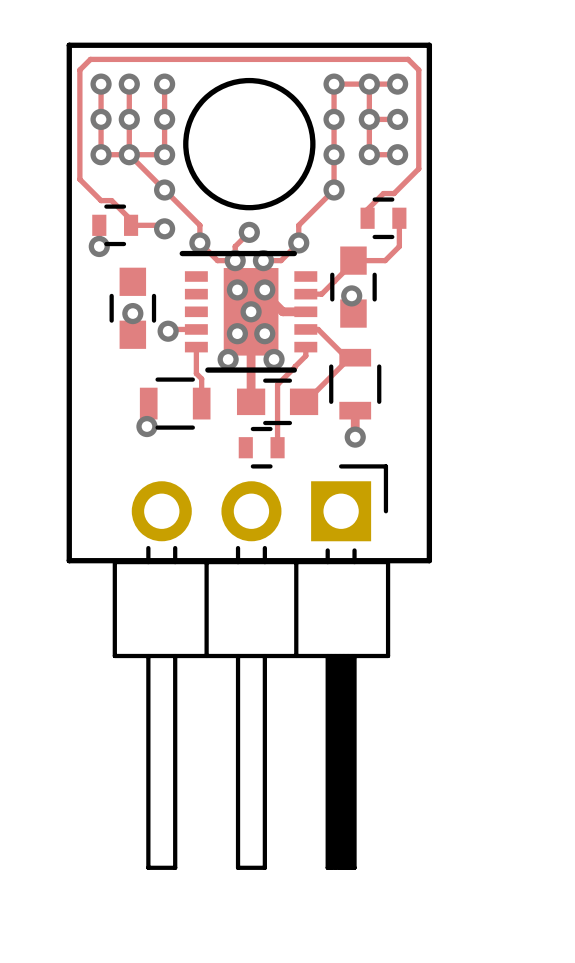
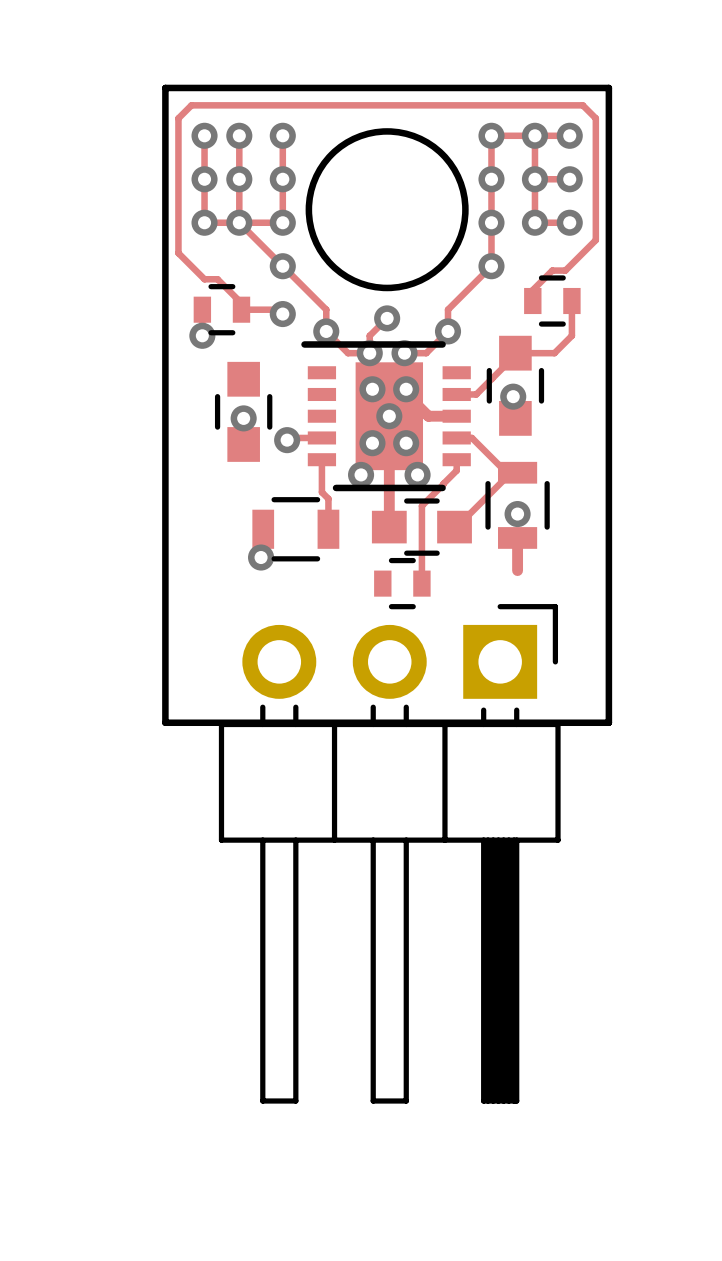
via position: (355, 437) -> (517, 514)

